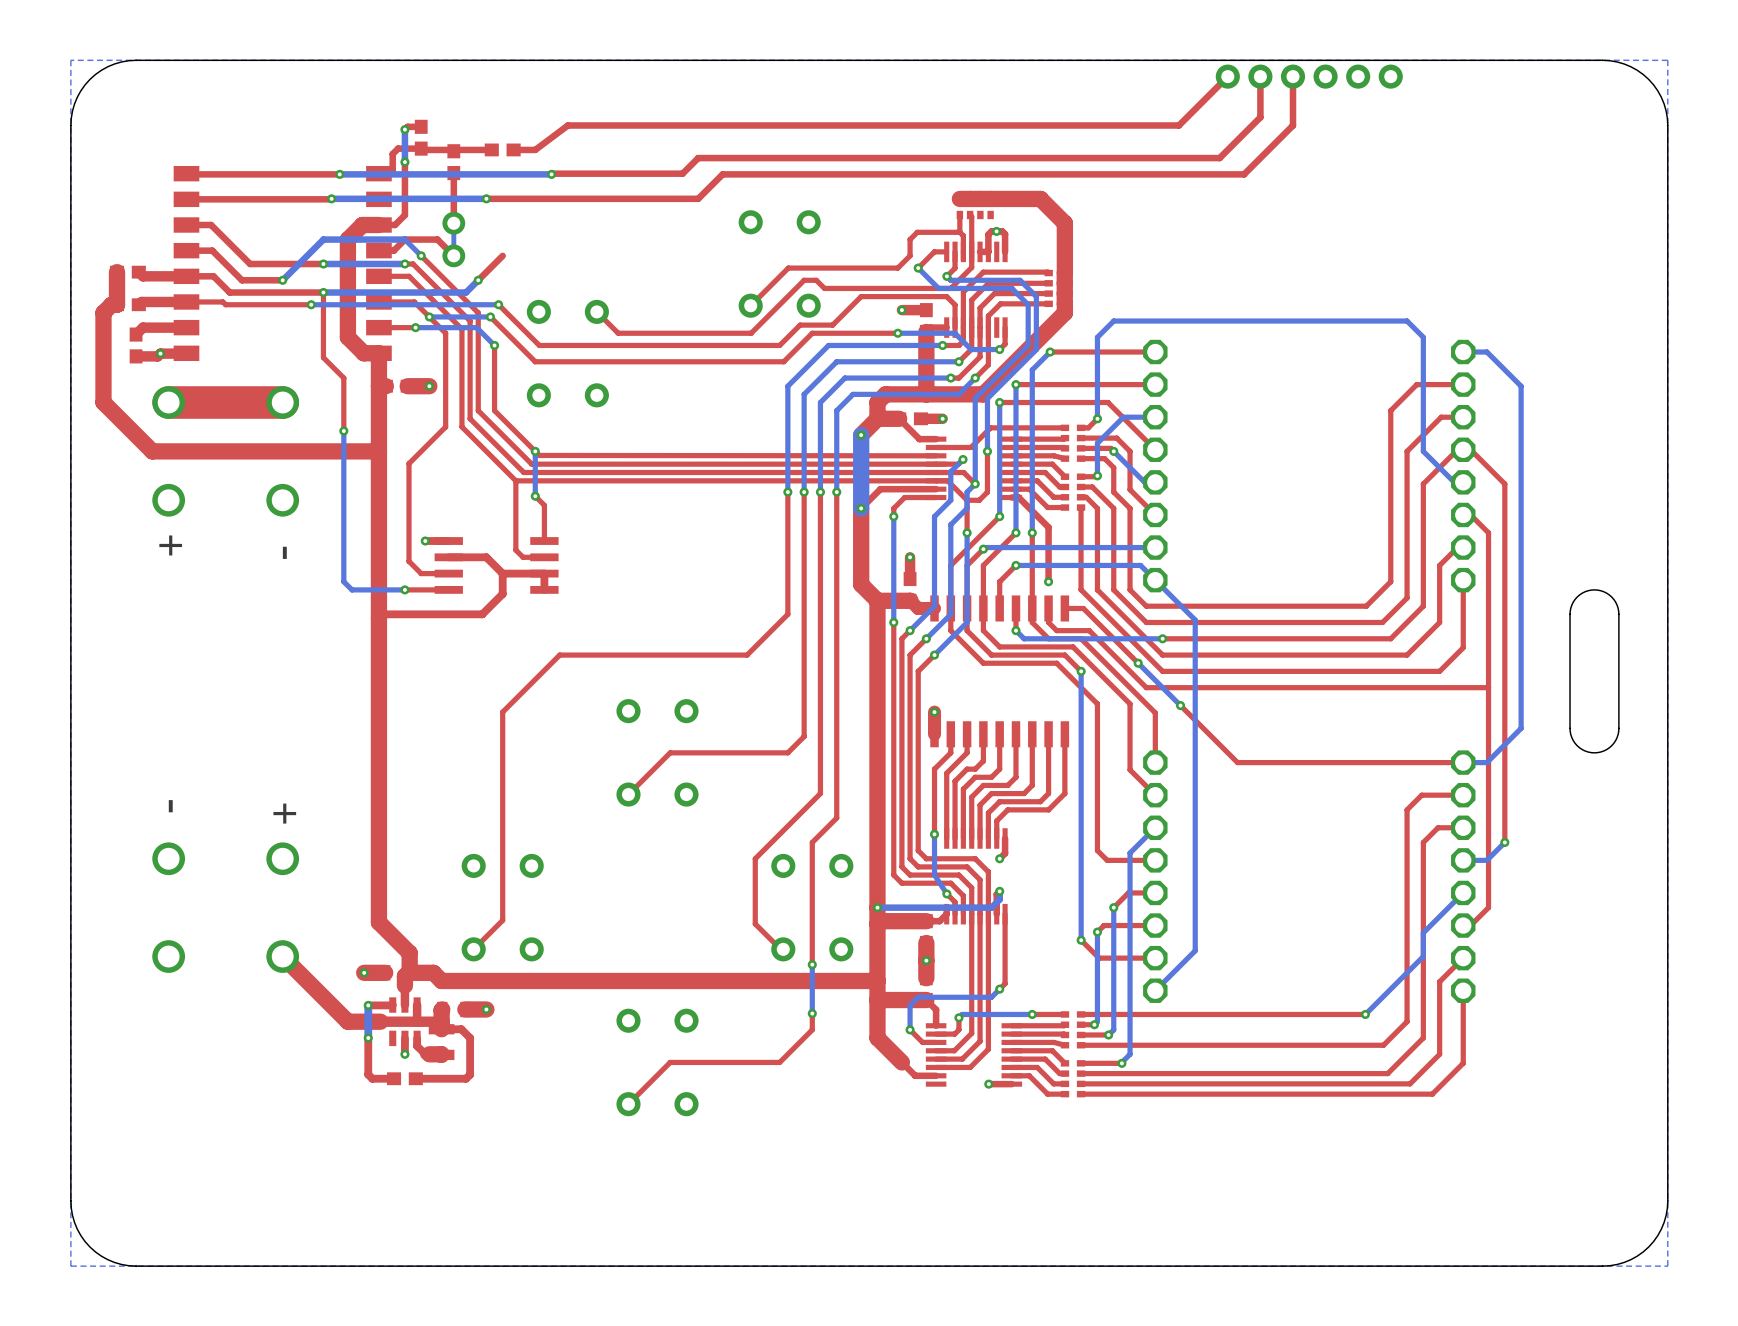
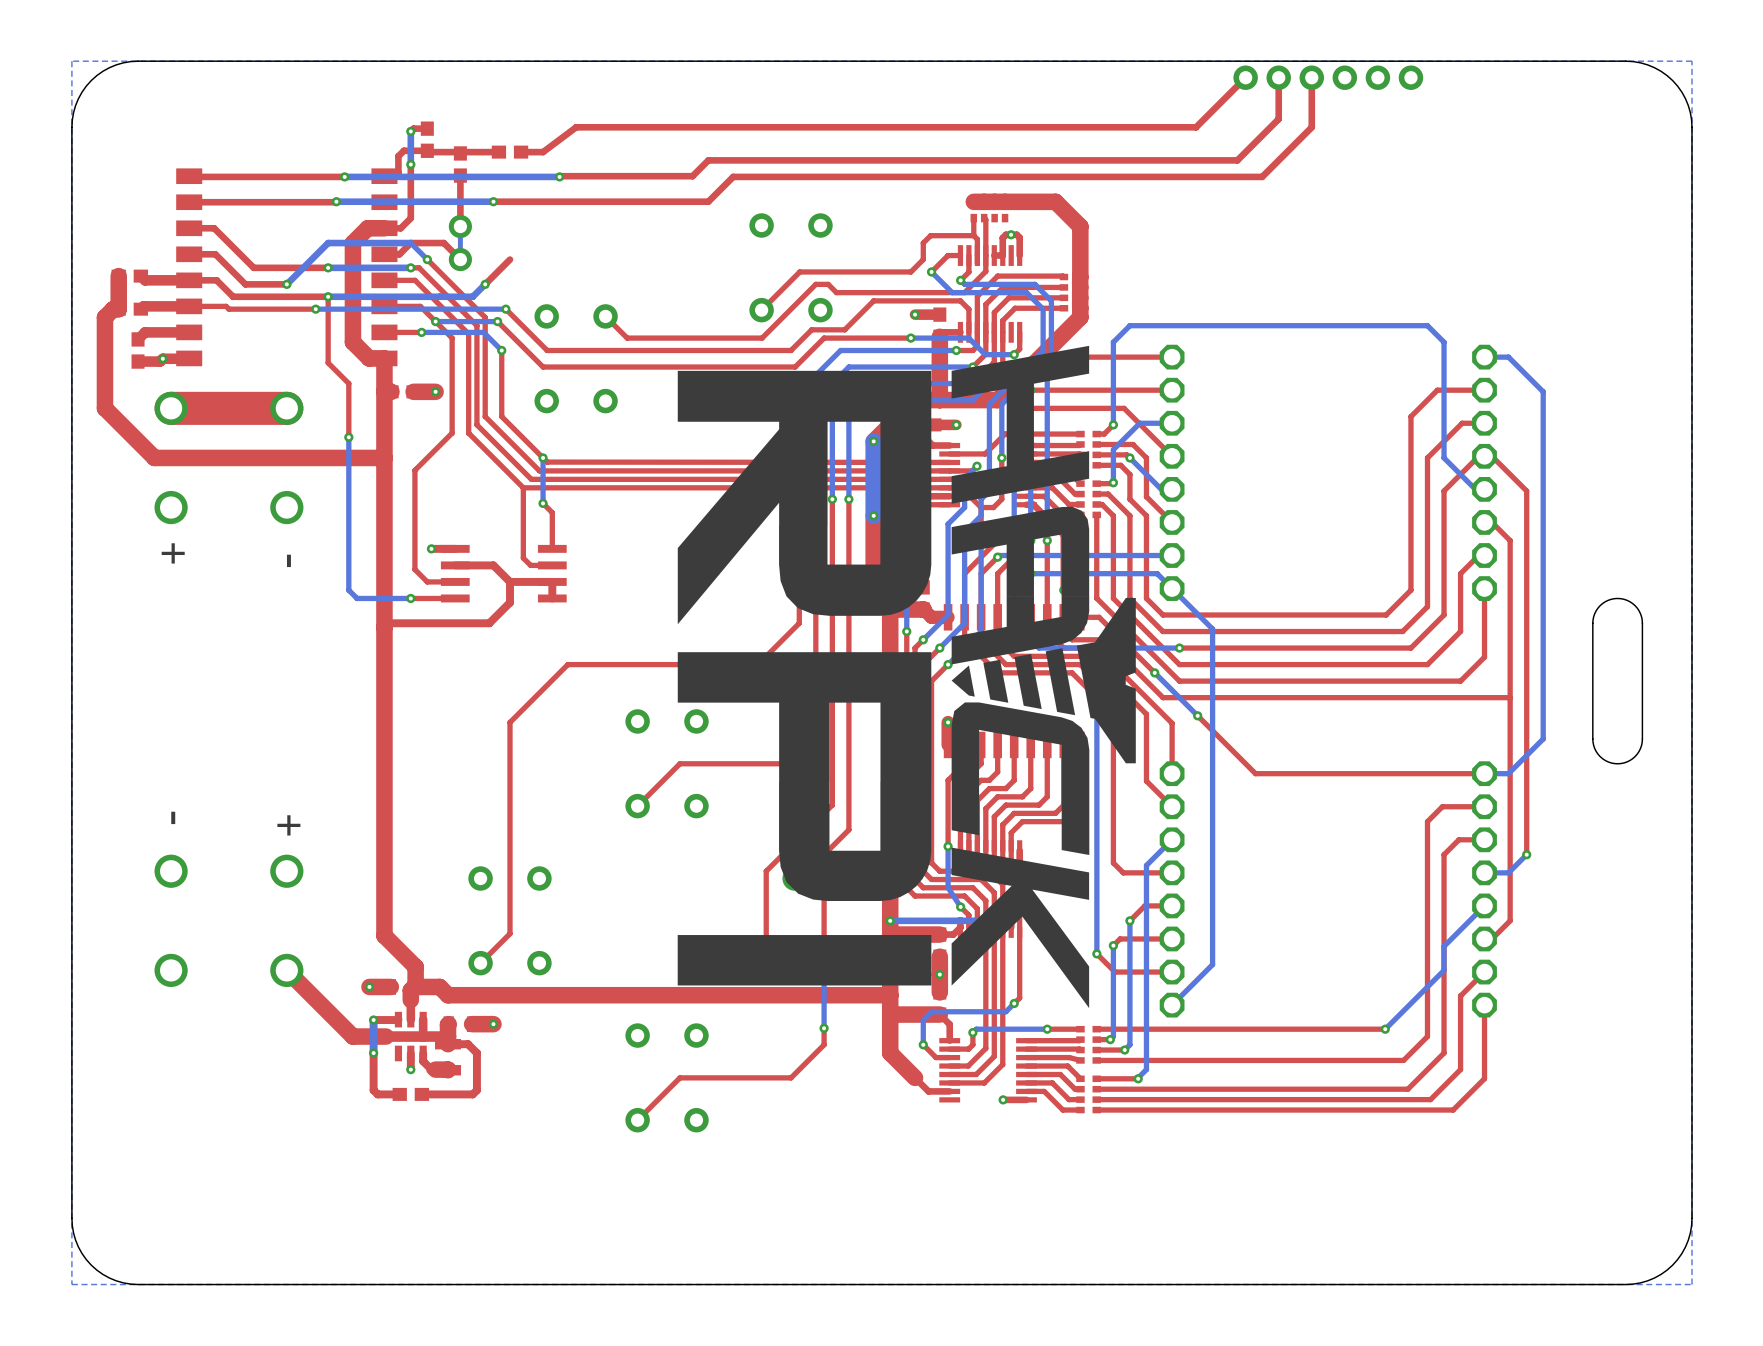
drawing: none -> [677, 345, 1136, 1009]

